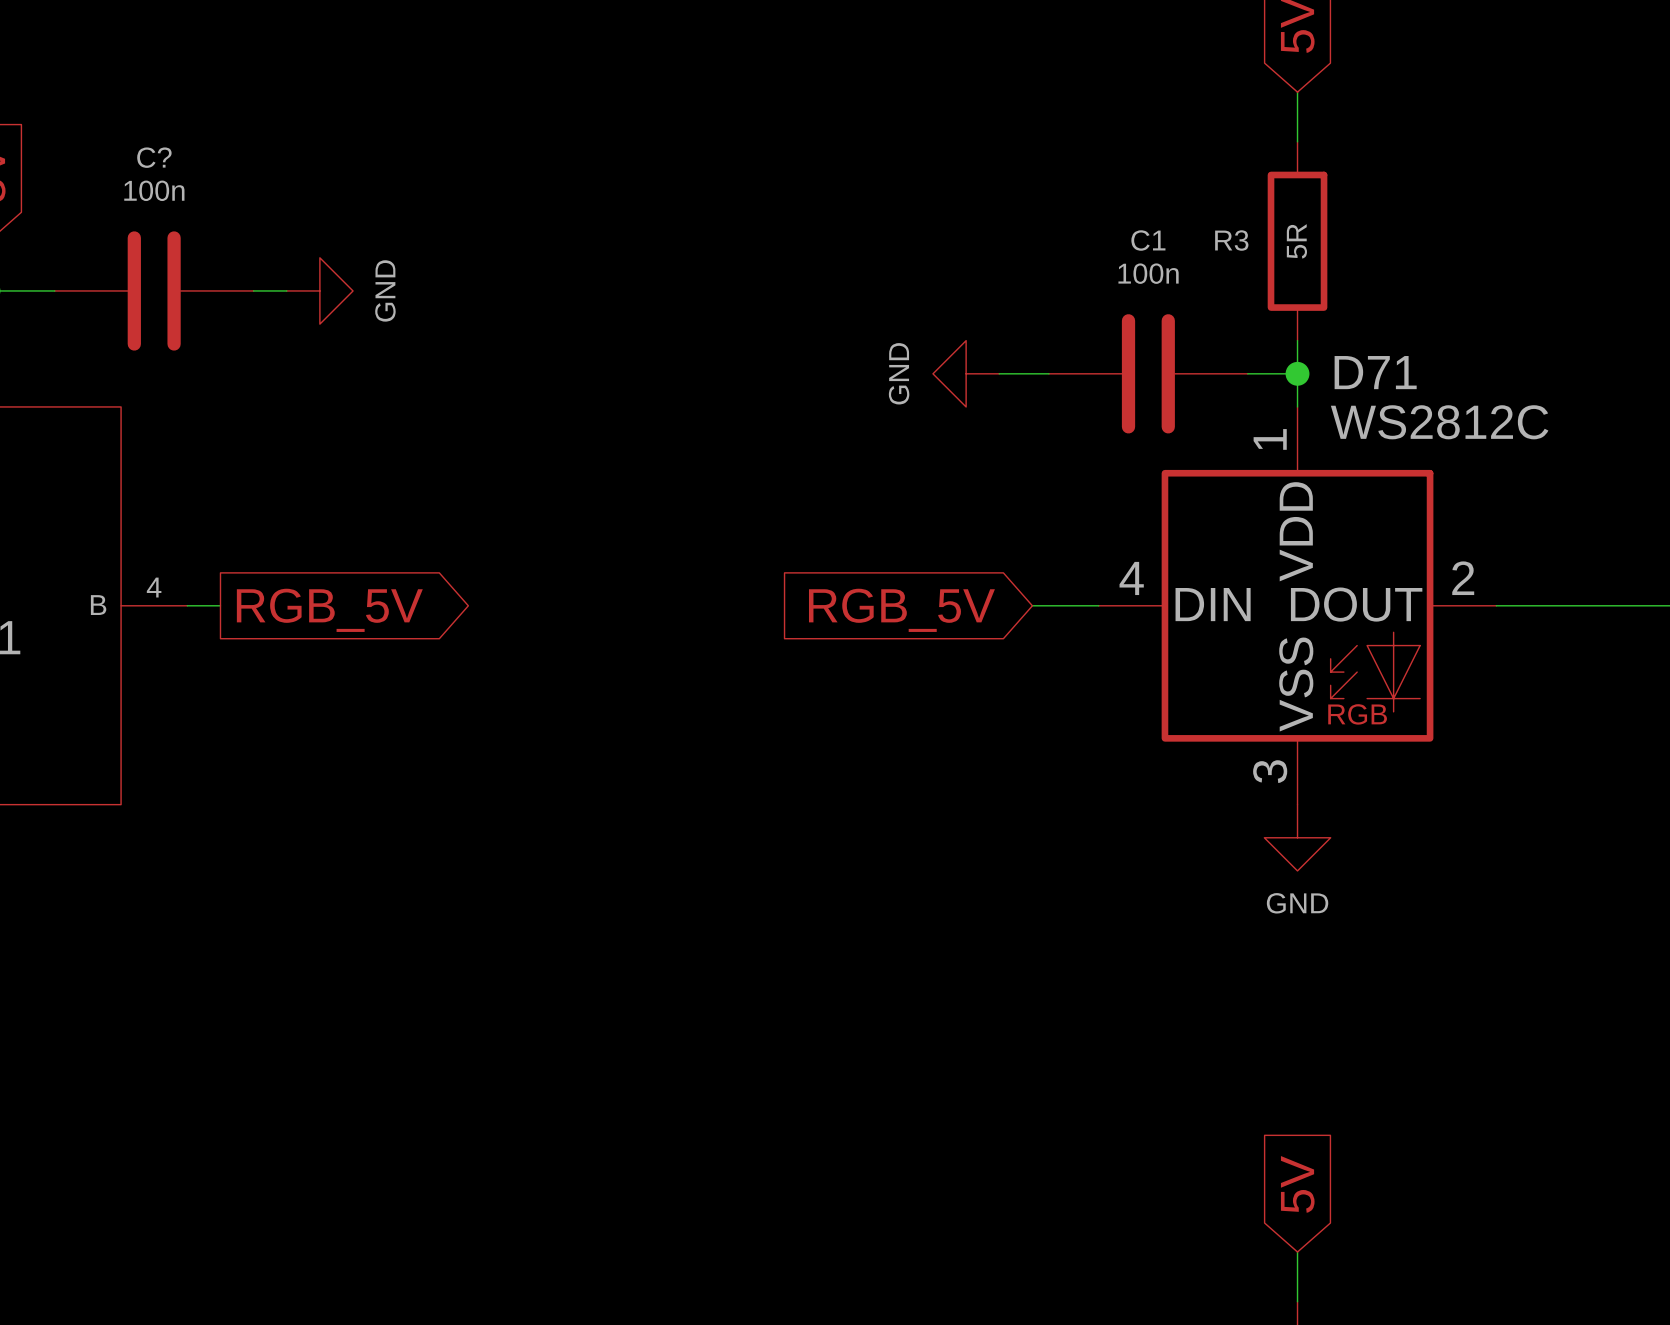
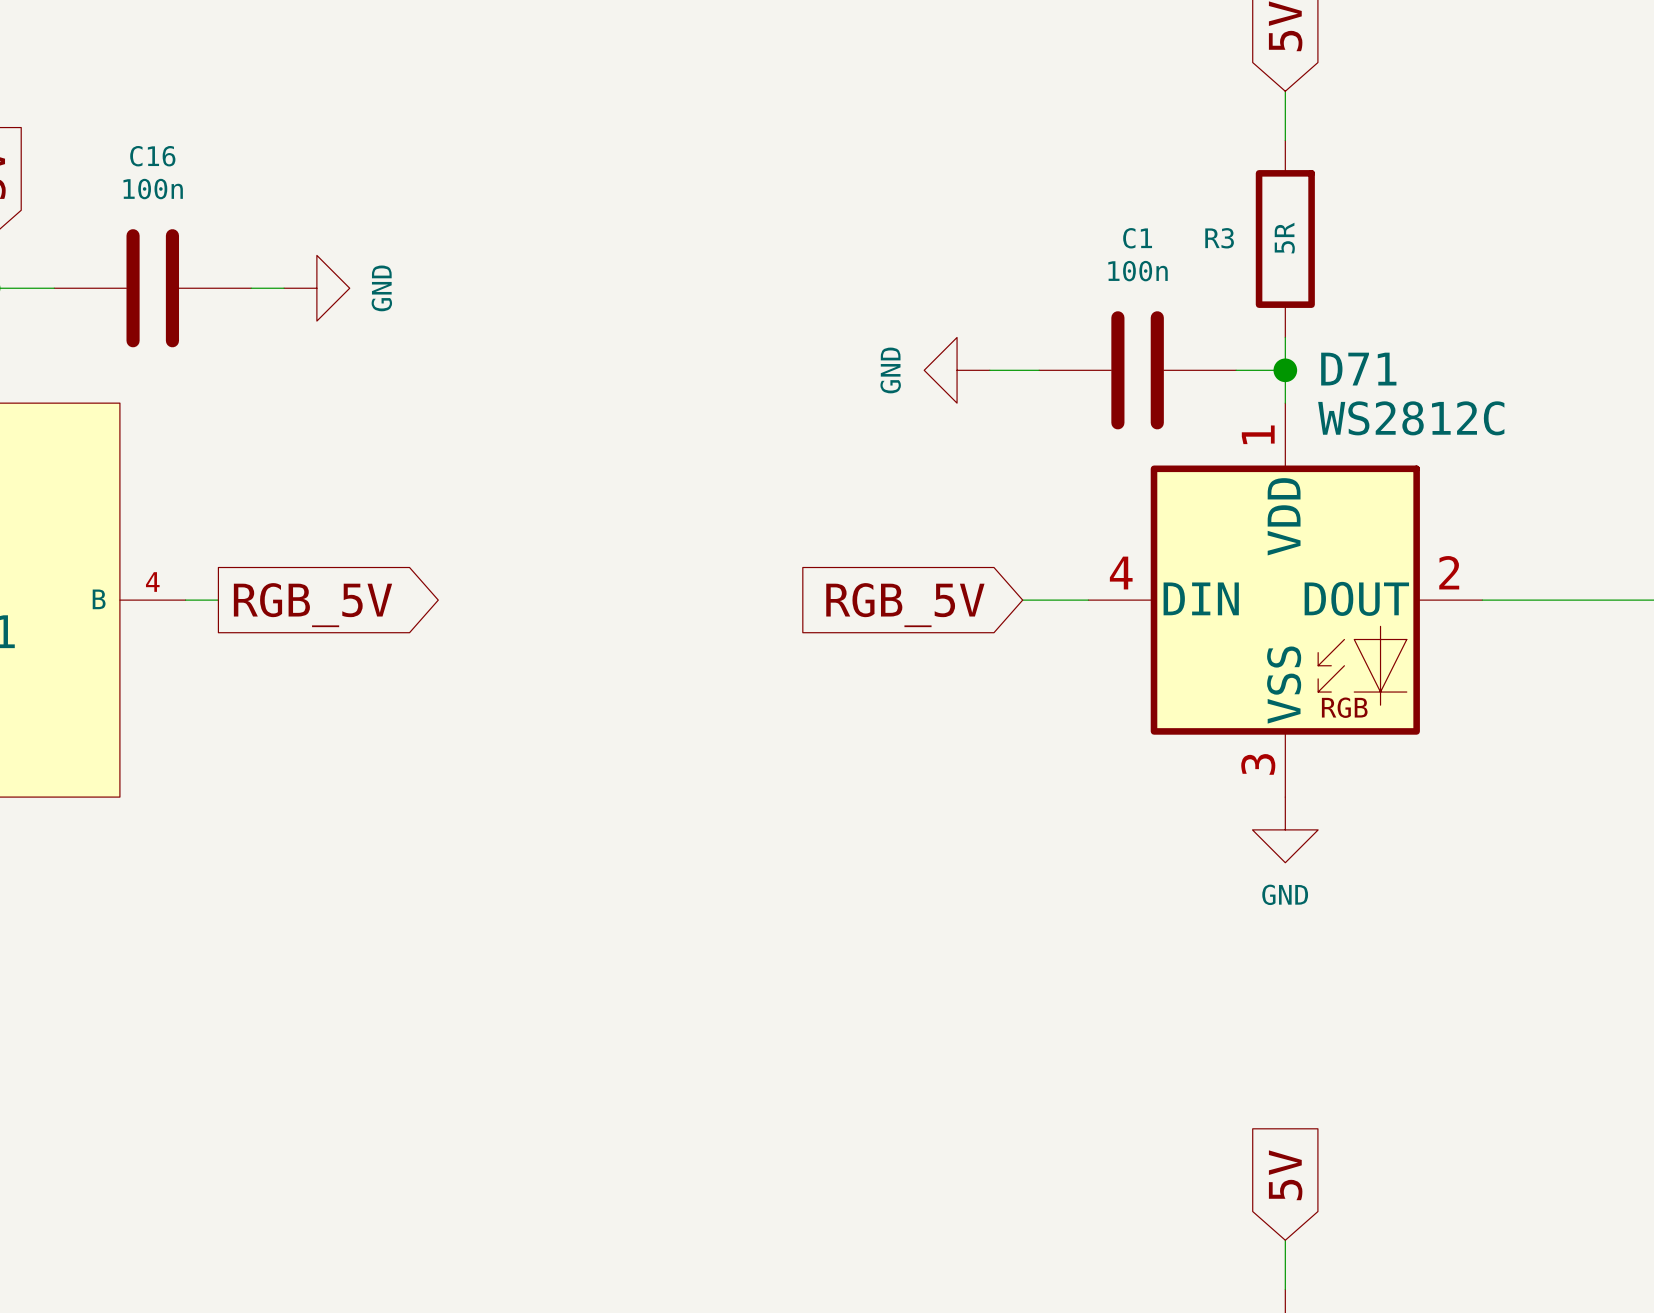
C? name: C? (154, 157) -> C16 (152, 156)

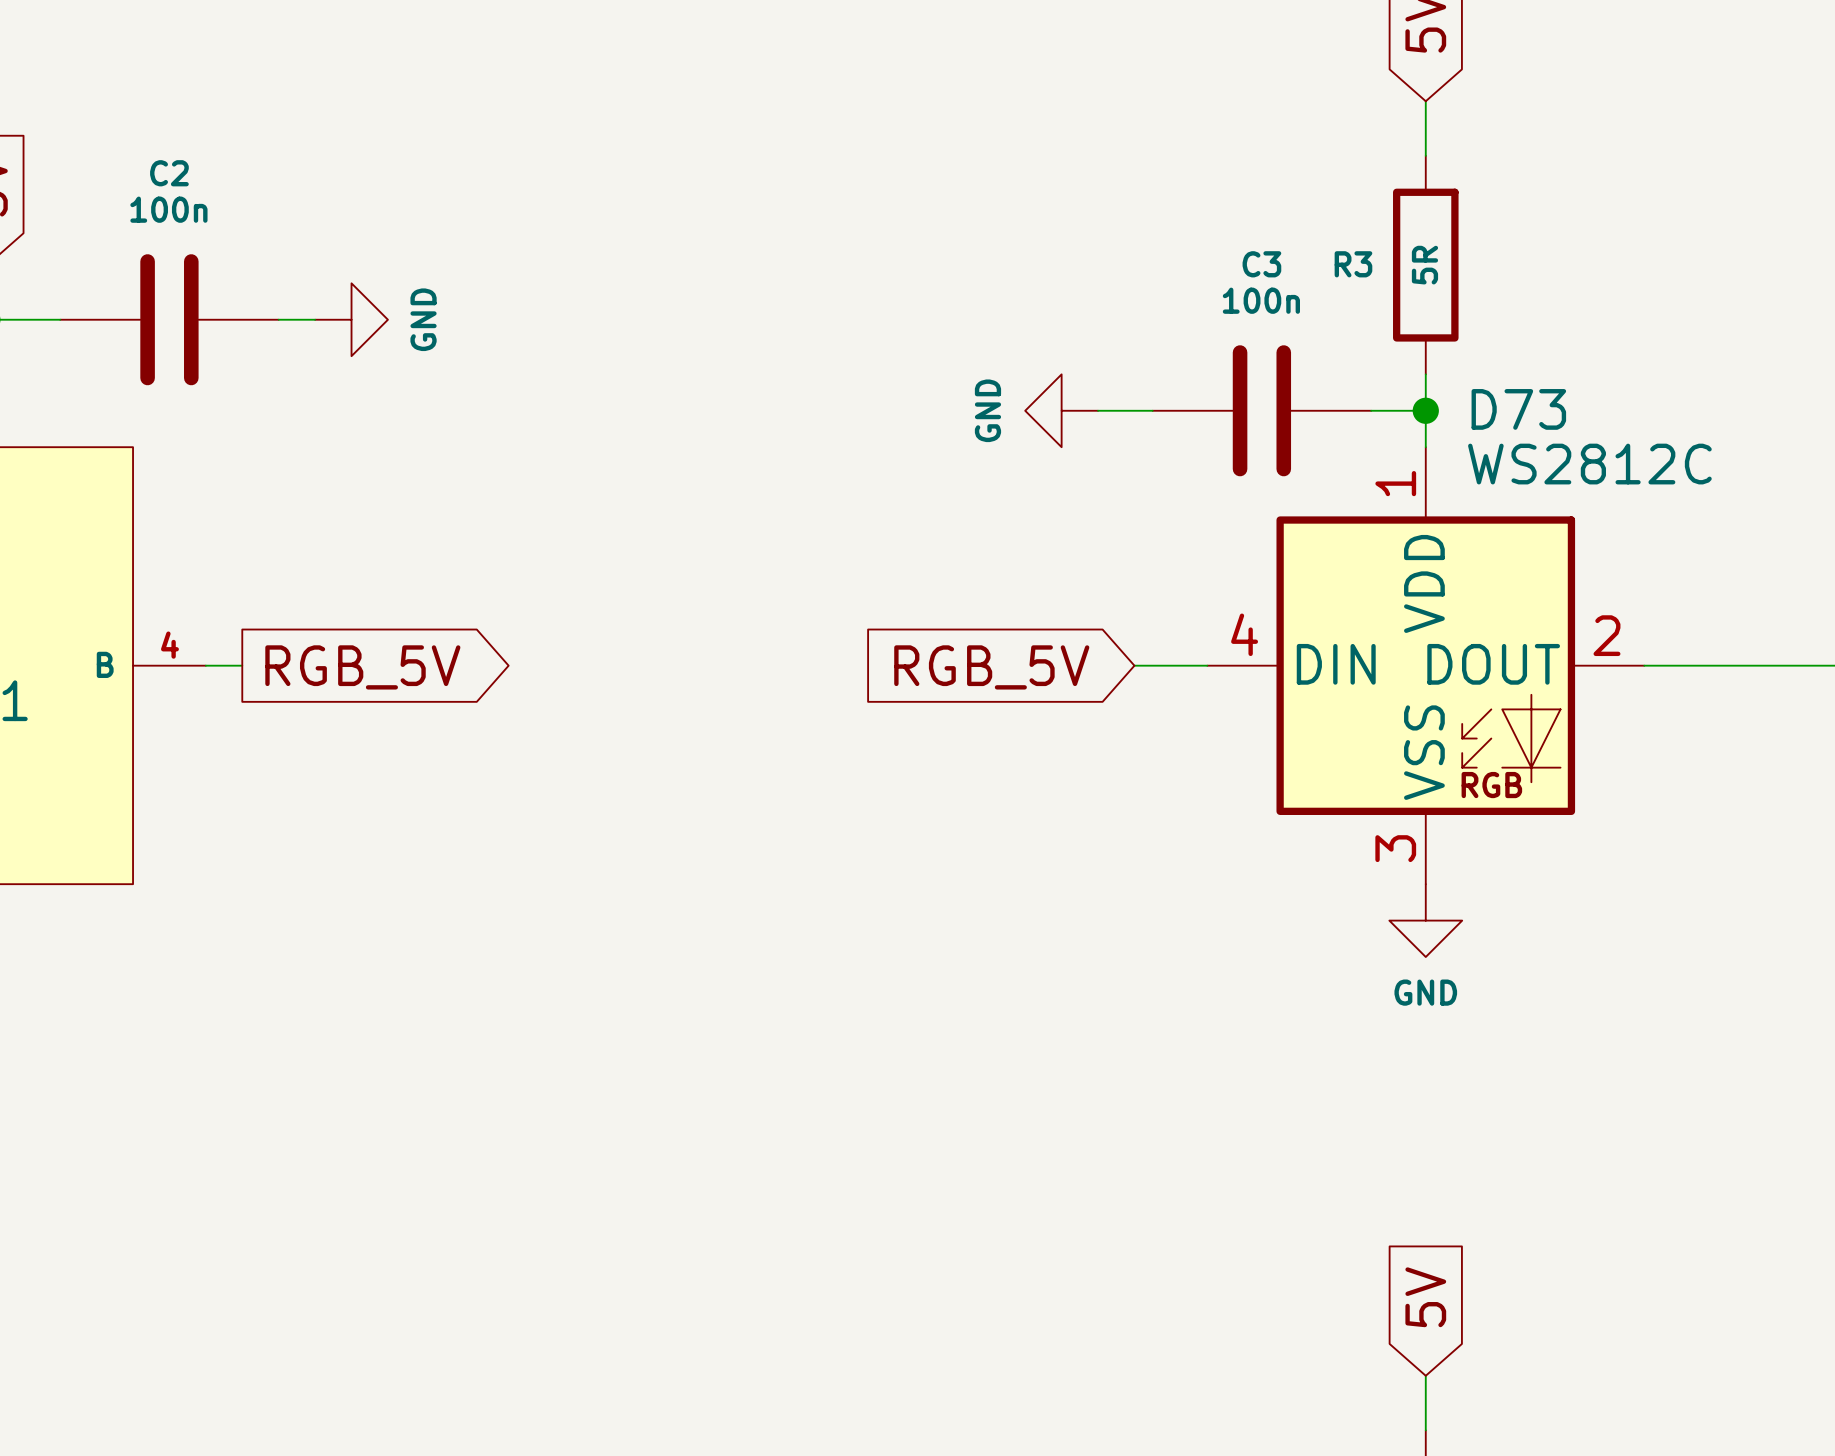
C16 name: C16 (152, 156) -> C2 (169, 173)
C1 name: C1 (1137, 238) -> C3 (1261, 264)
D71 name: D71 (1358, 369) -> D73 (1518, 409)

